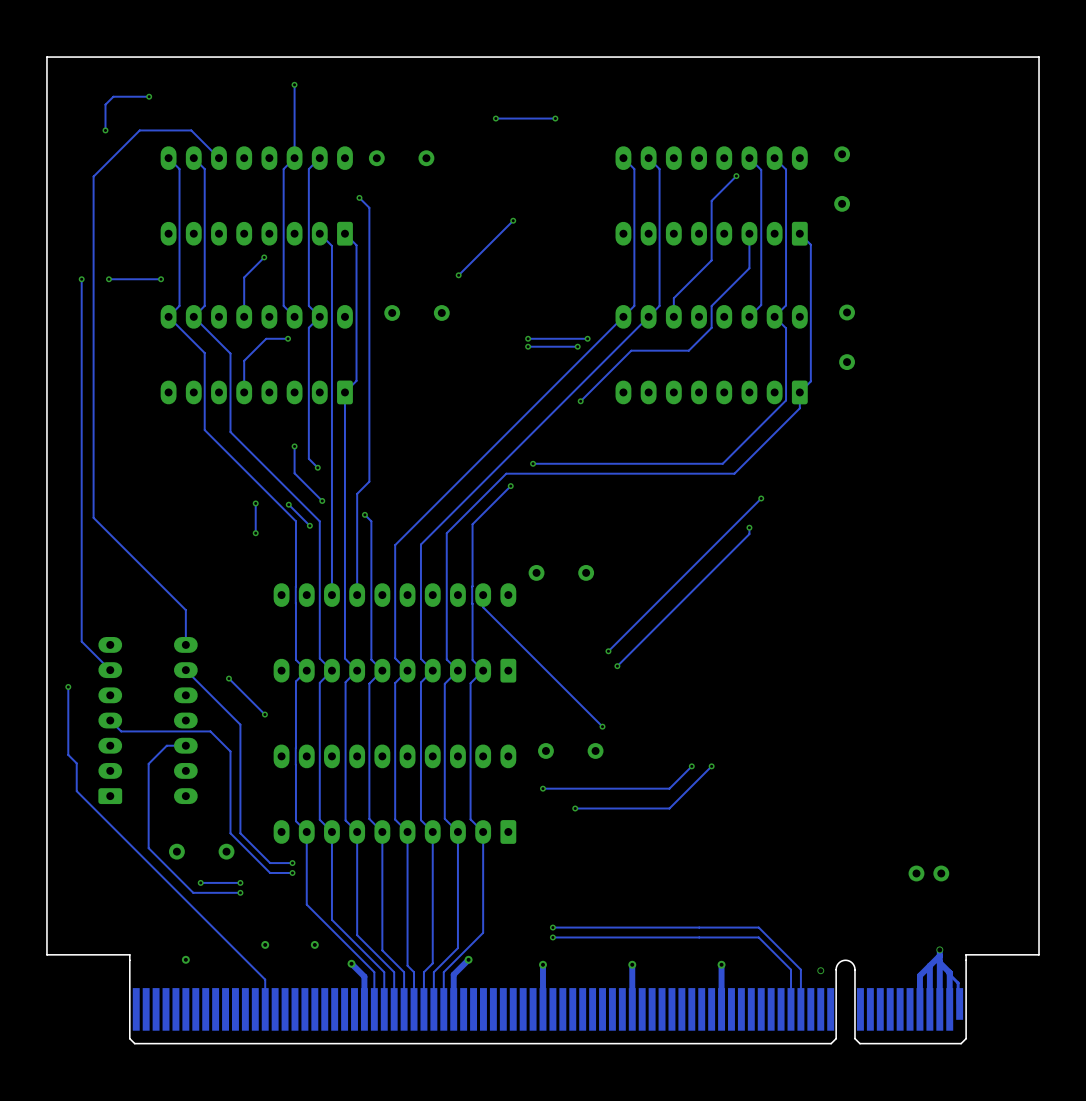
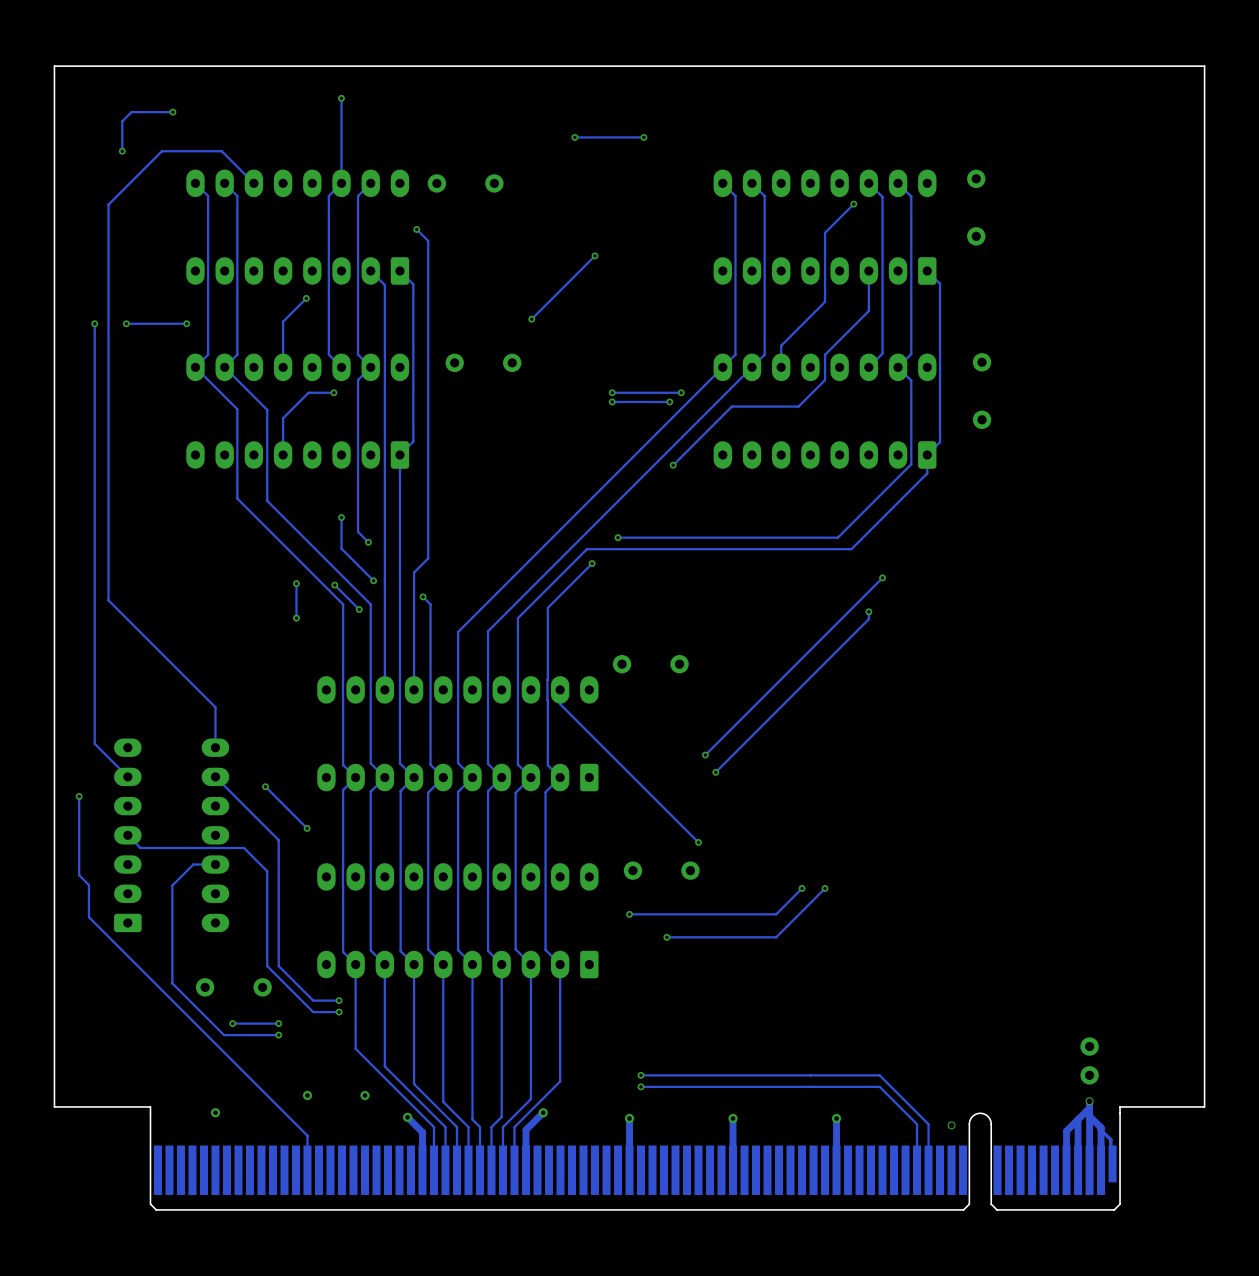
part rotation: 0° (928, 873) -> 90° clockwise (1089, 1060)
part position: (928, 873) -> (1089, 1060)

